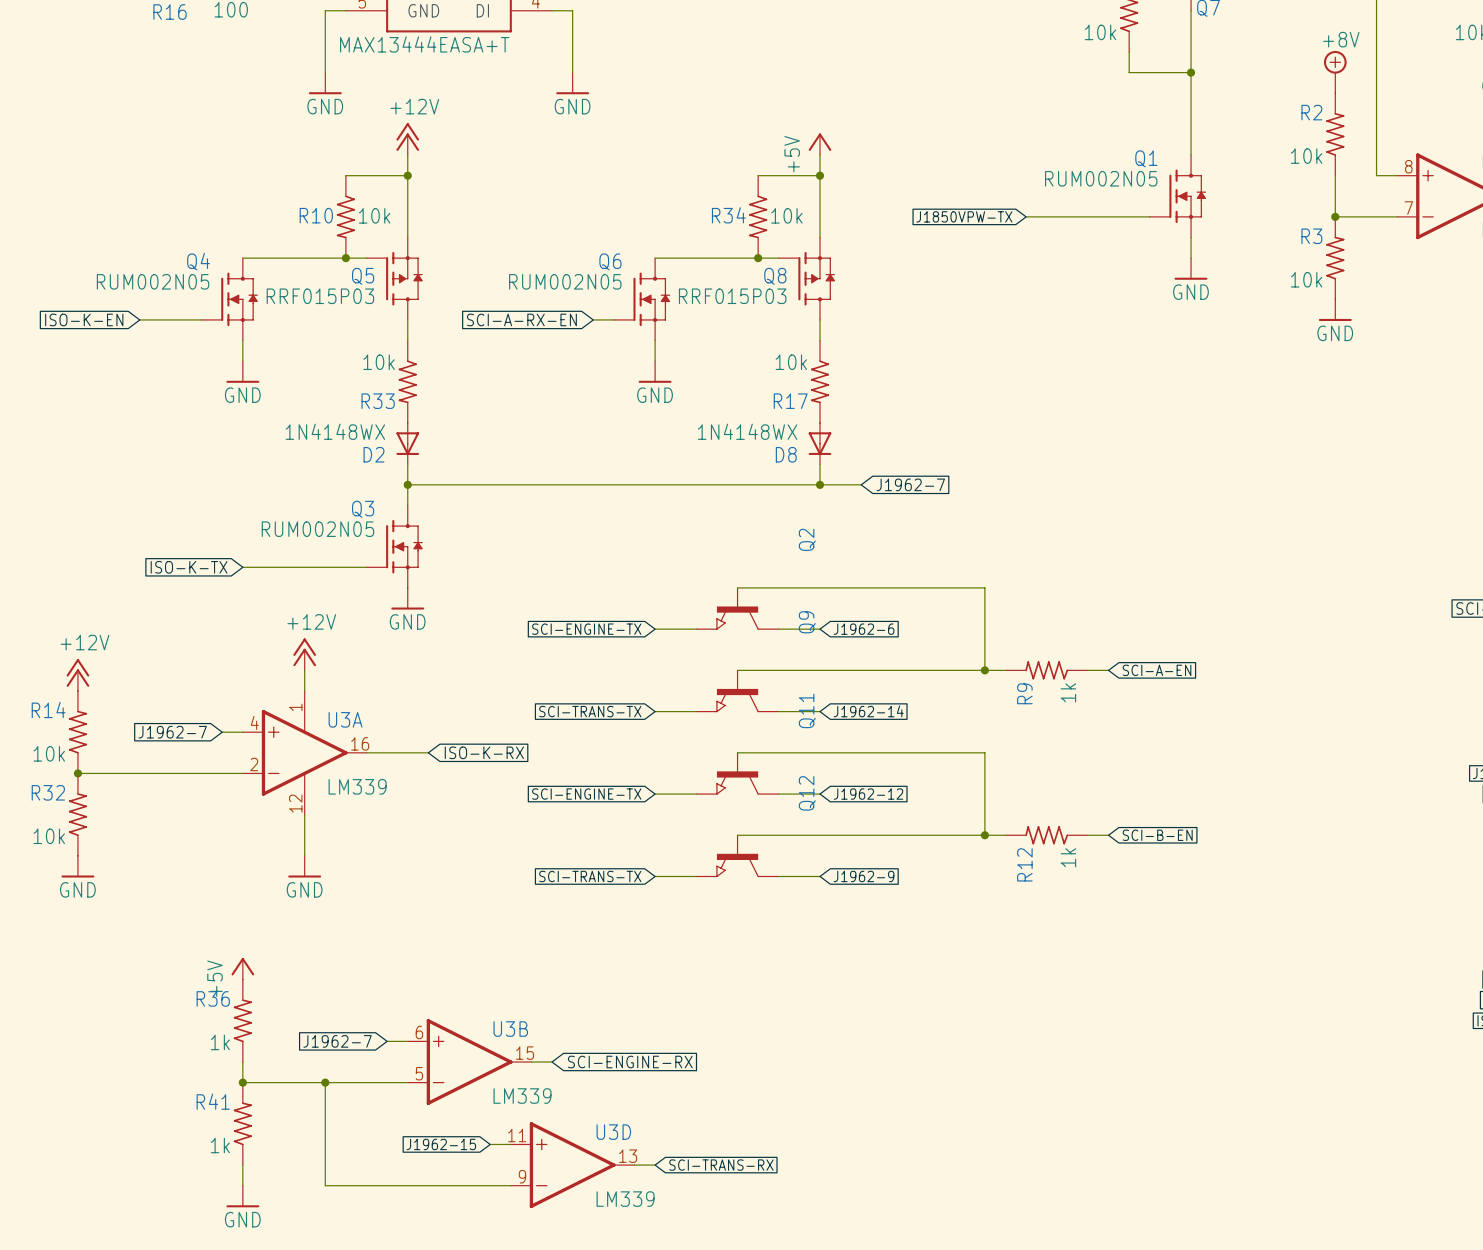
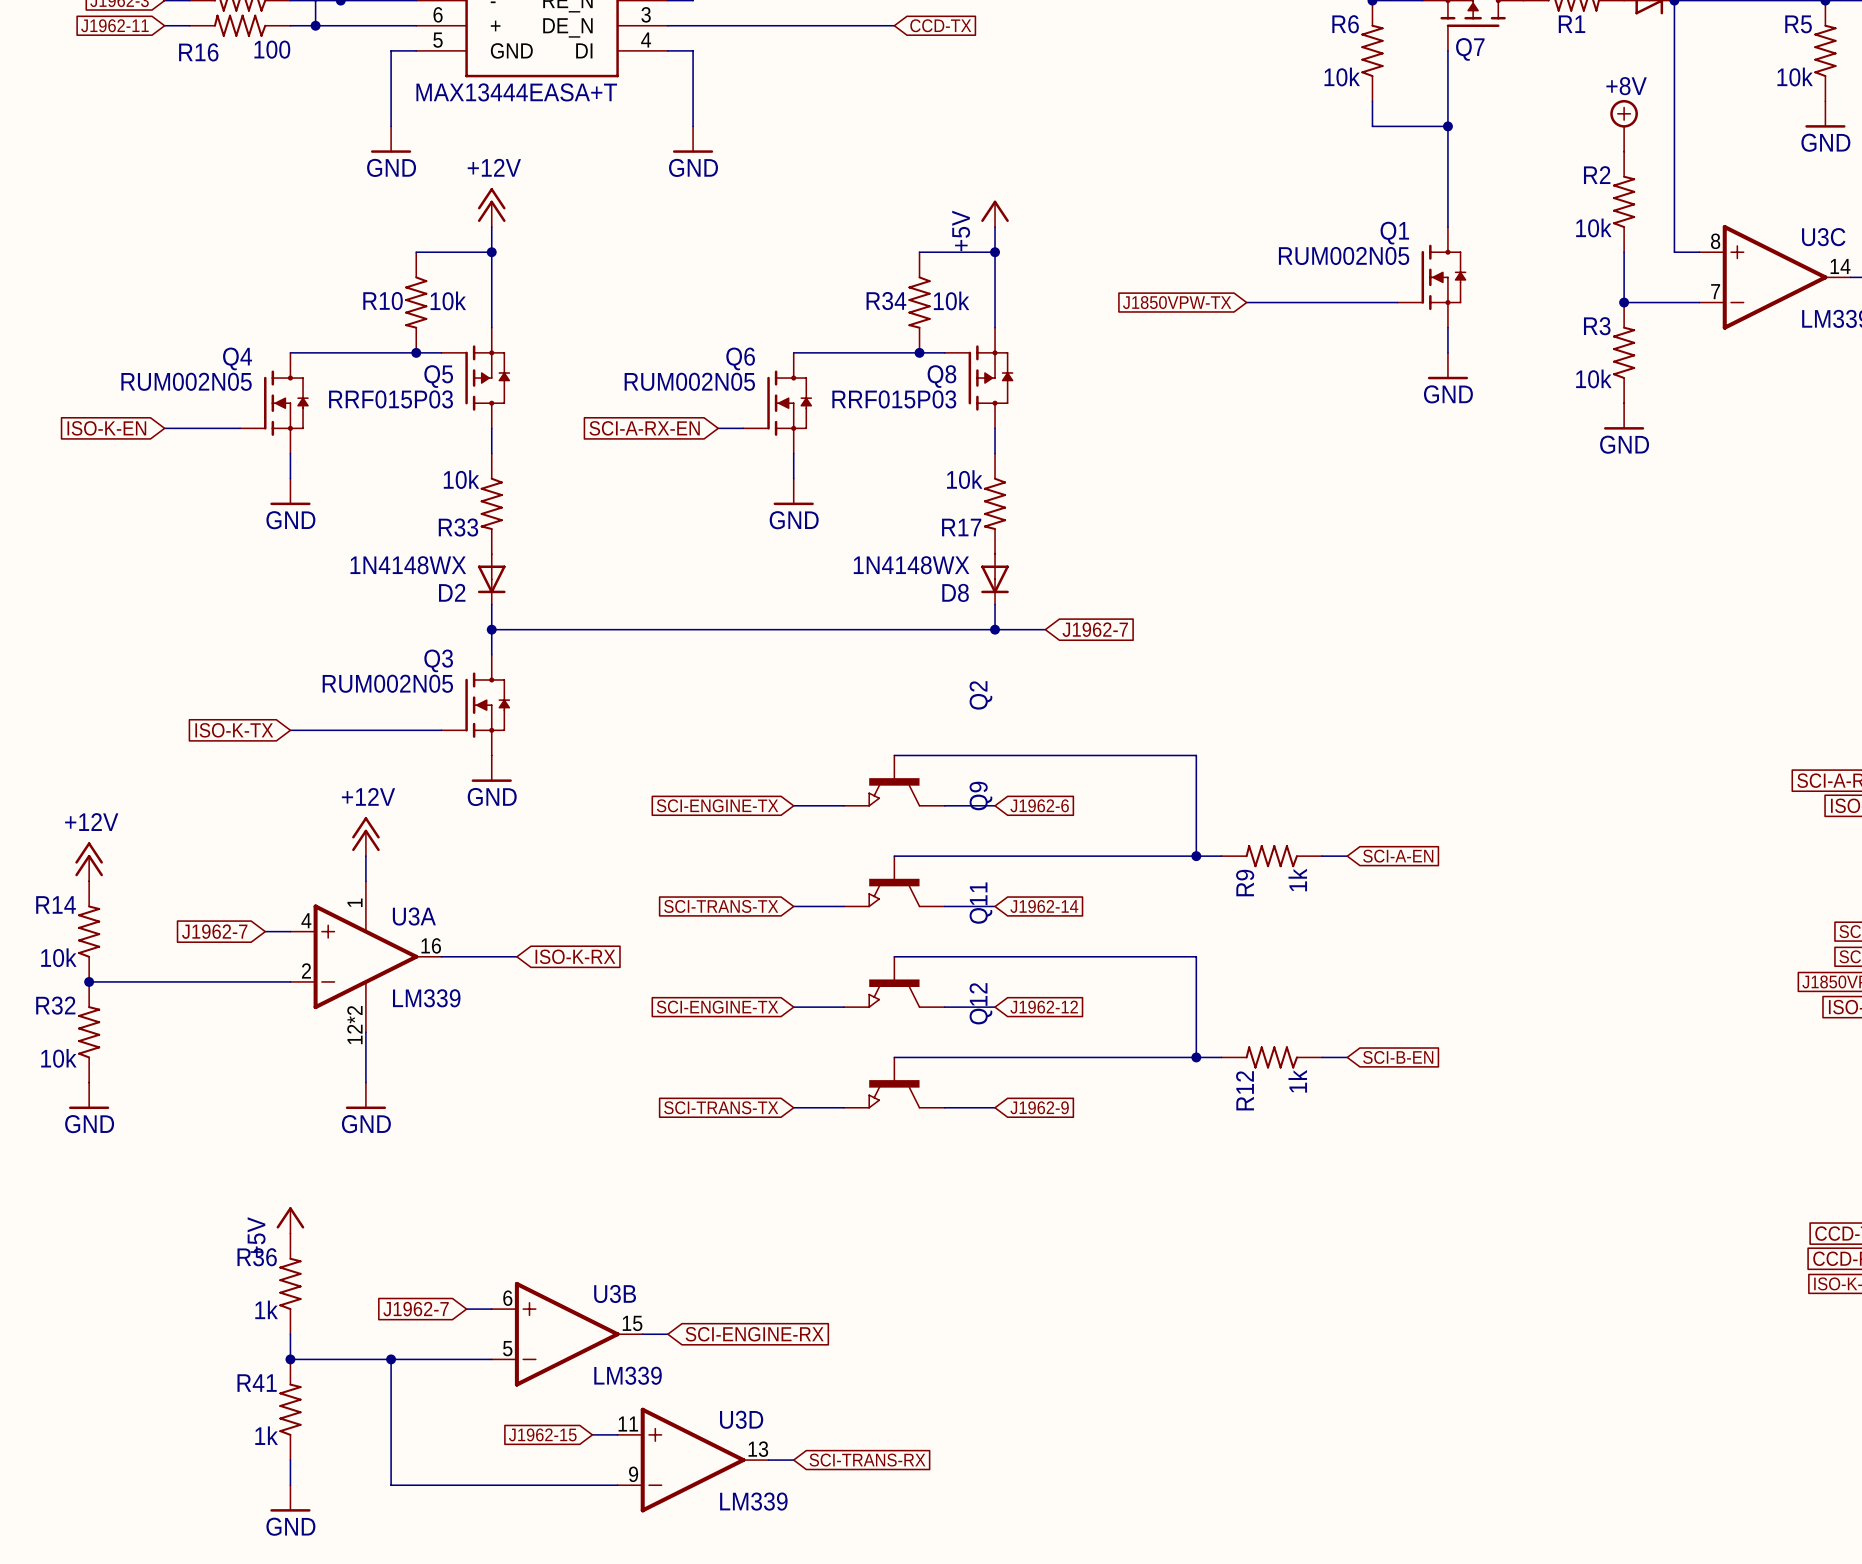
U3A pin number: 12 (295, 803) -> 12*2 (354, 1025)

